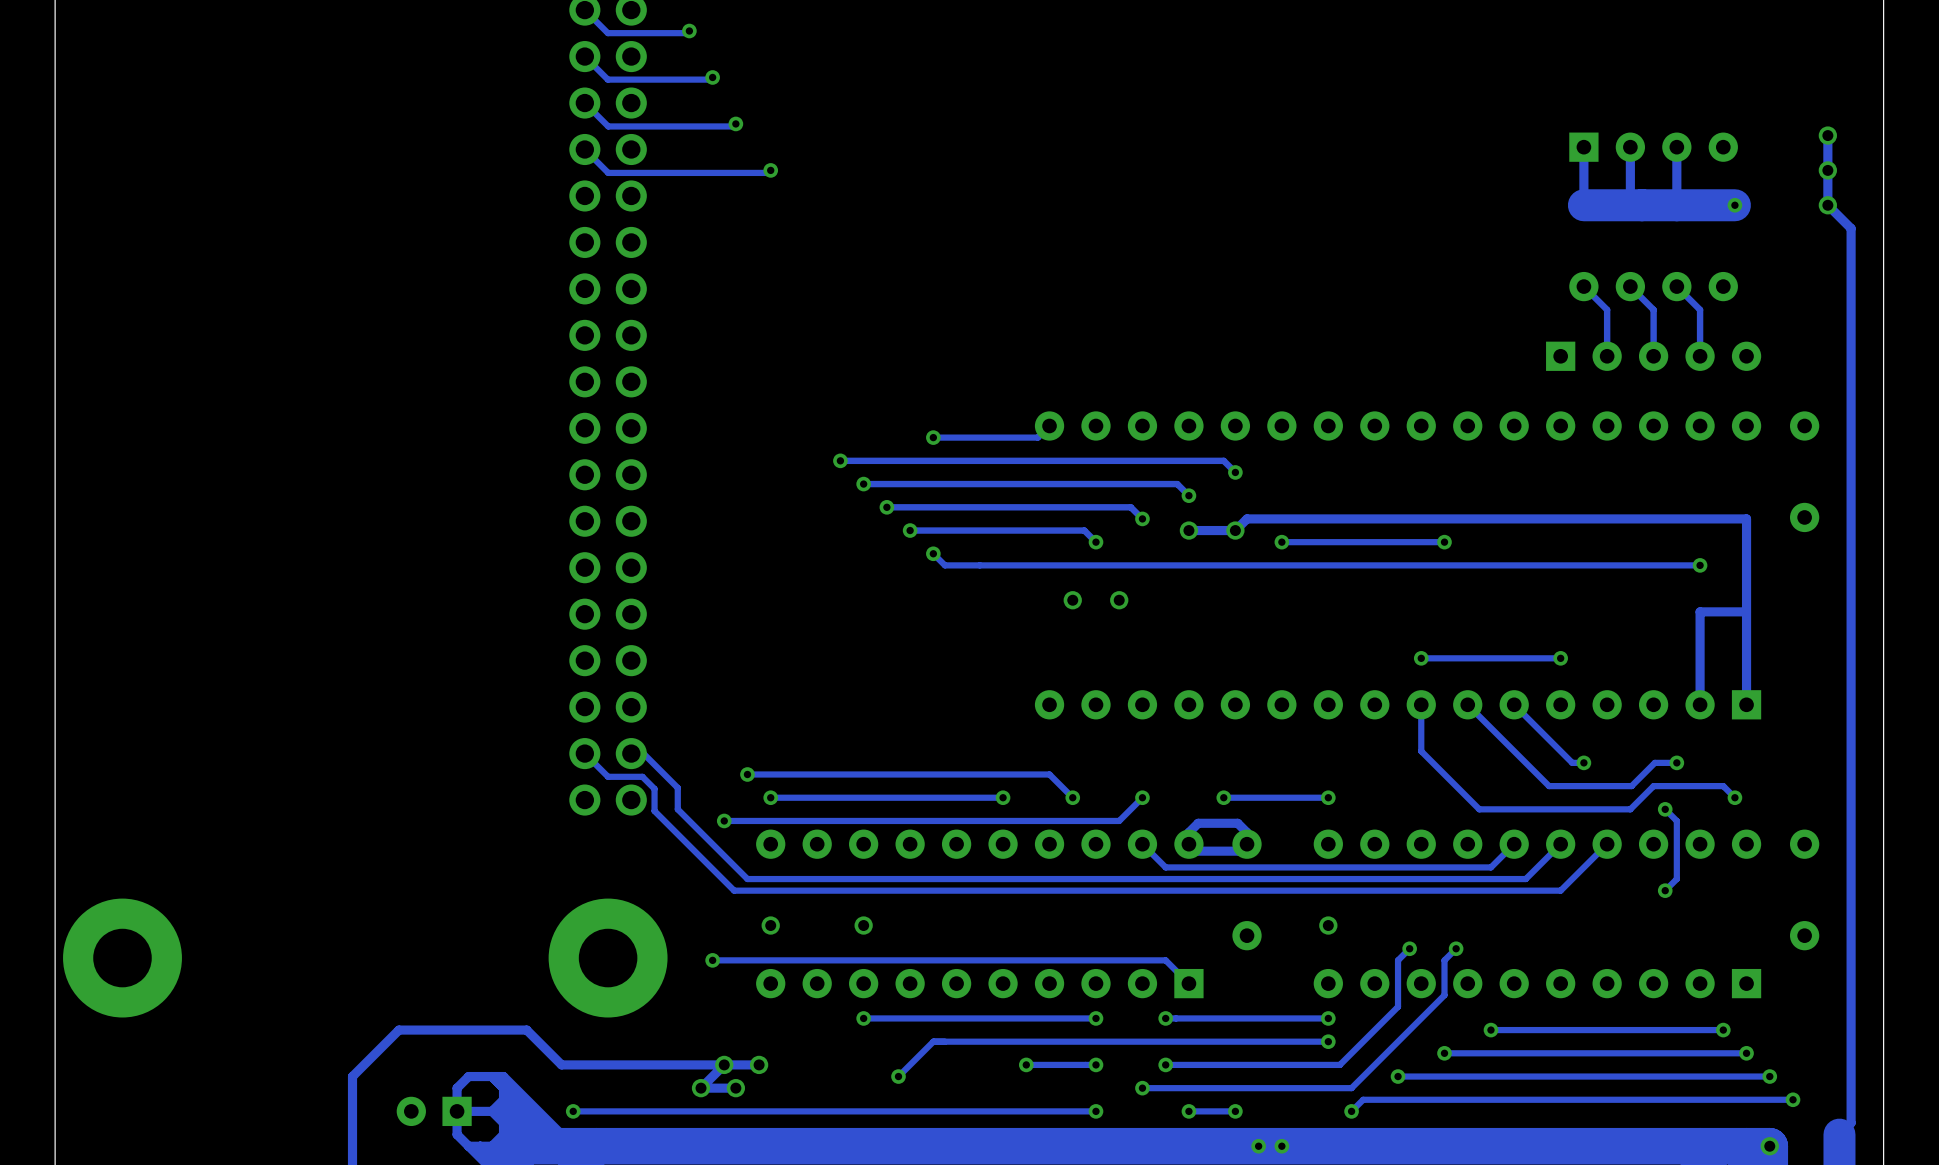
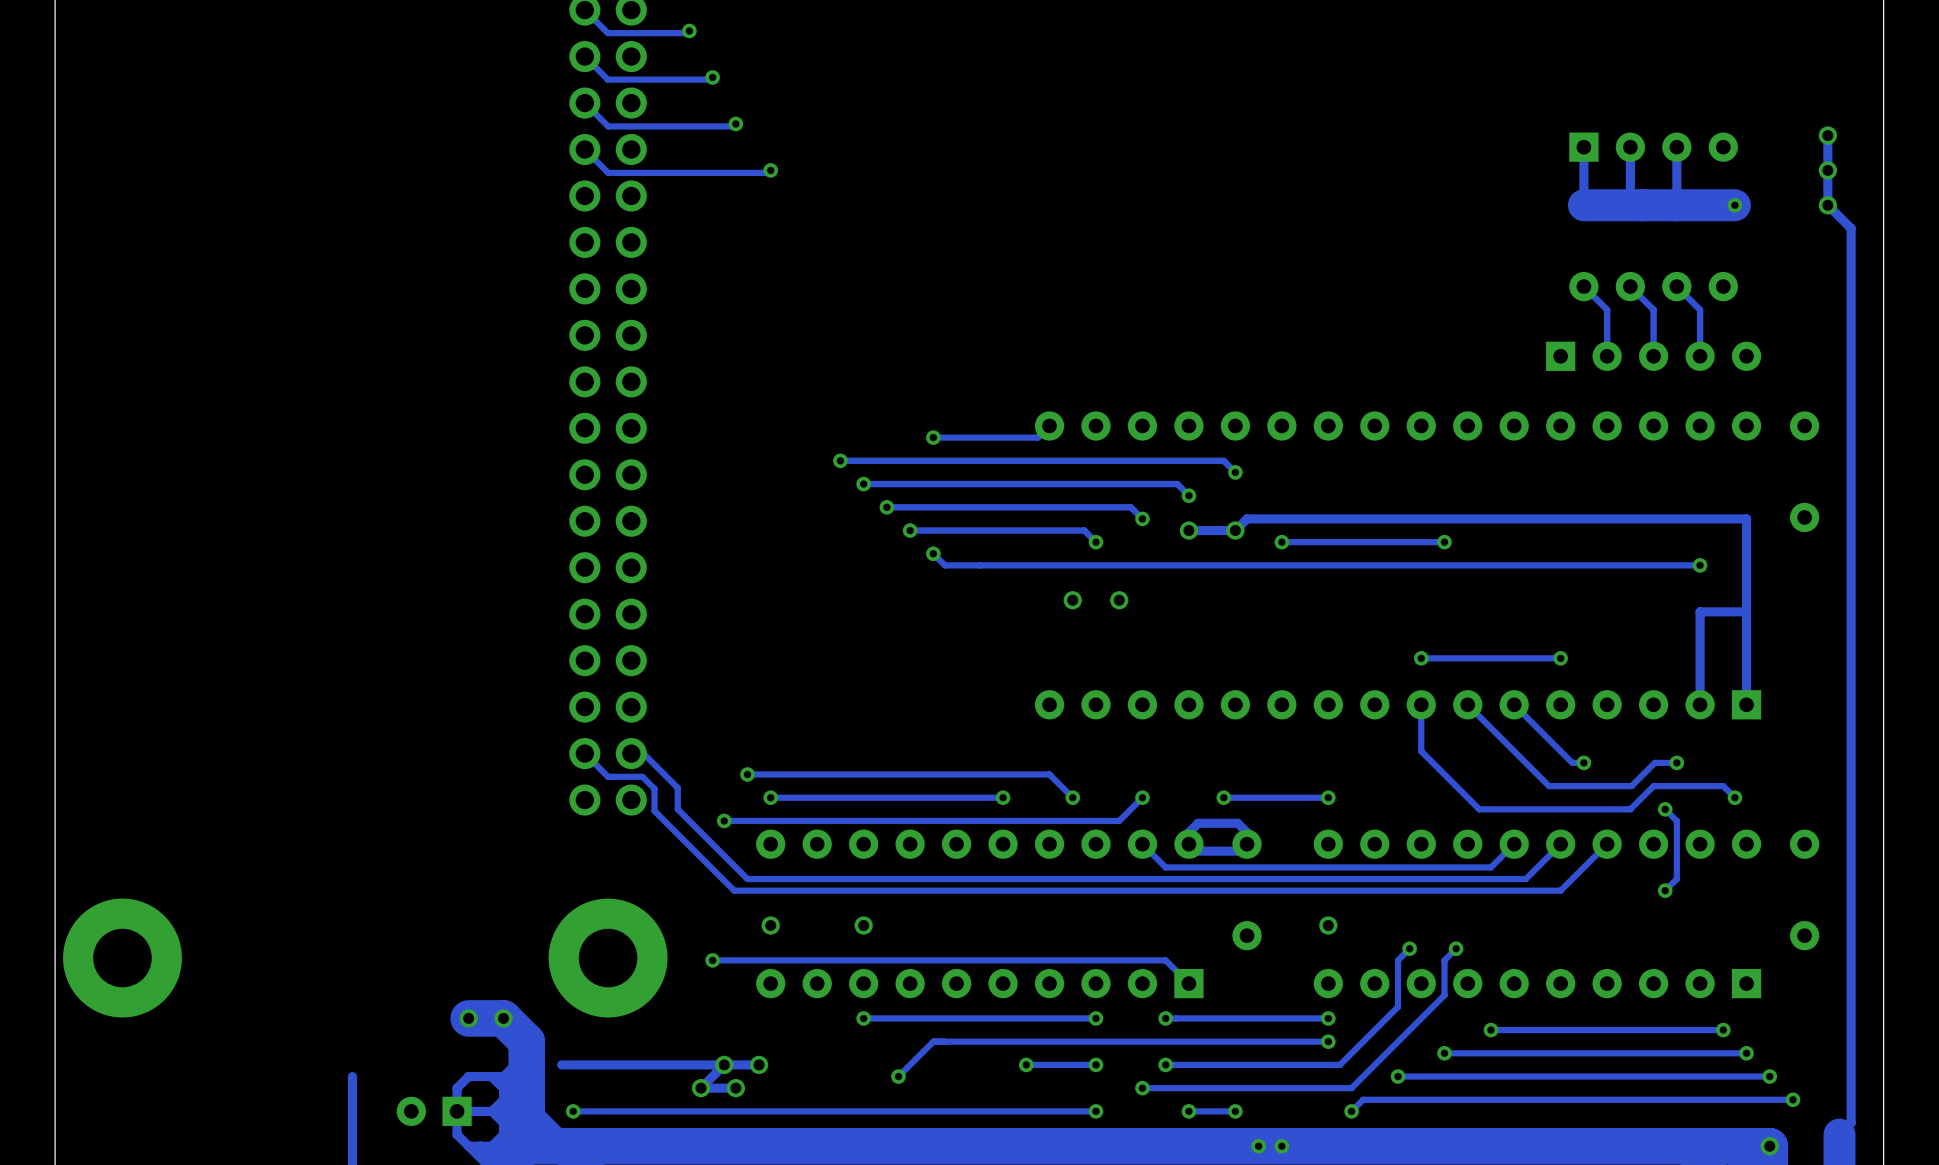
track: none -> (468, 1018) (503, 1018) (526, 1041) (526, 1134)
via: none -> (468, 1018)
via: none -> (503, 1018)
track: none -> (515, 1064) (503, 1076)
track: (561, 1064) (526, 1030) (398, 1030) (352, 1076) -> none

